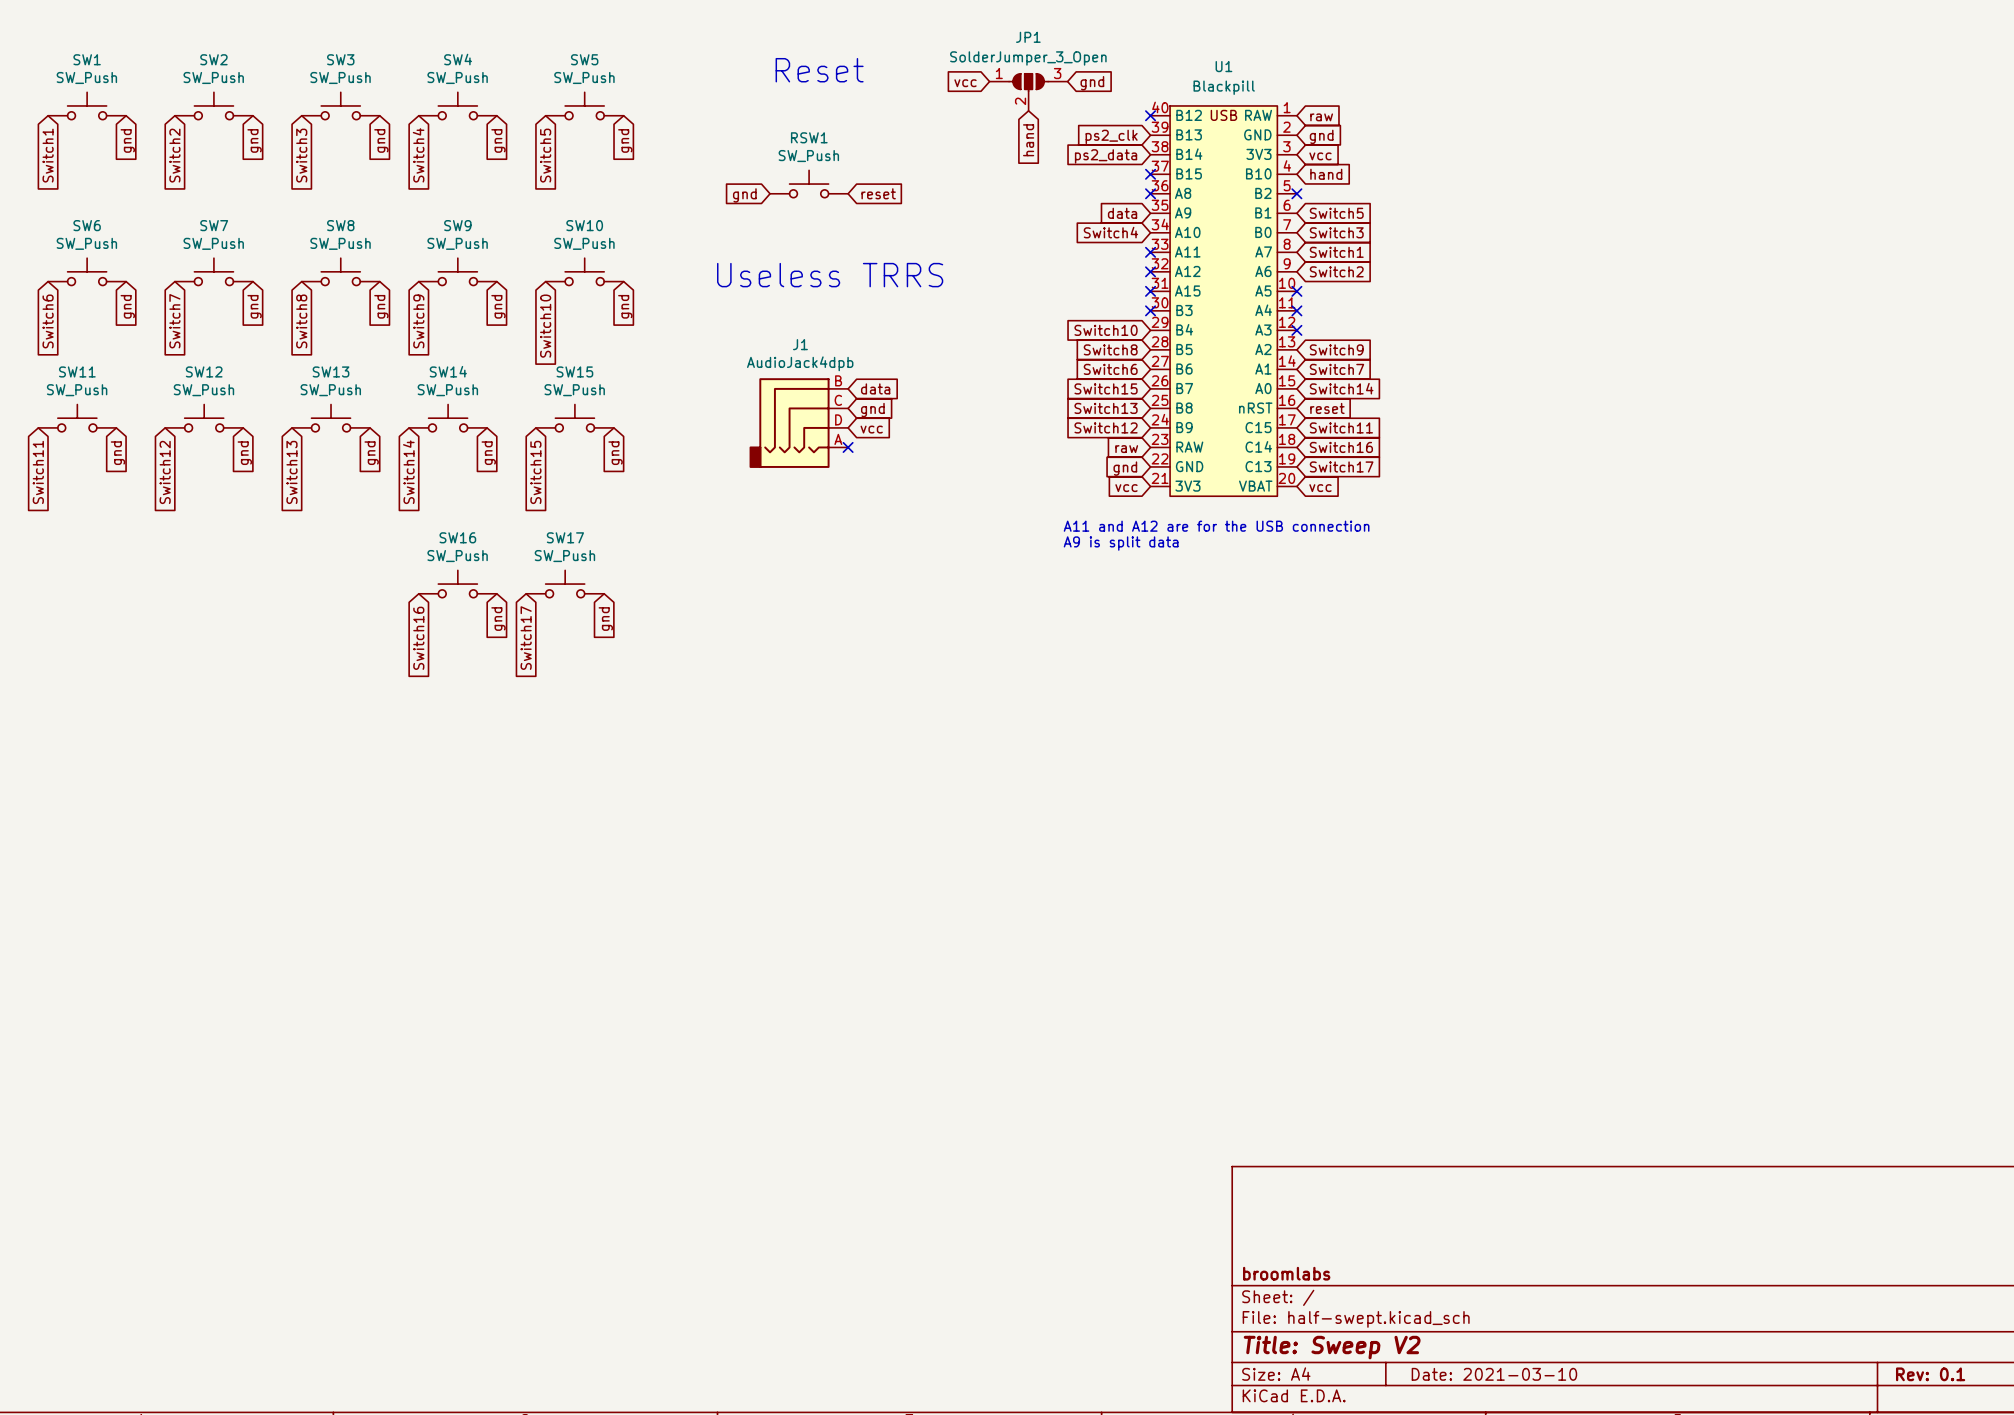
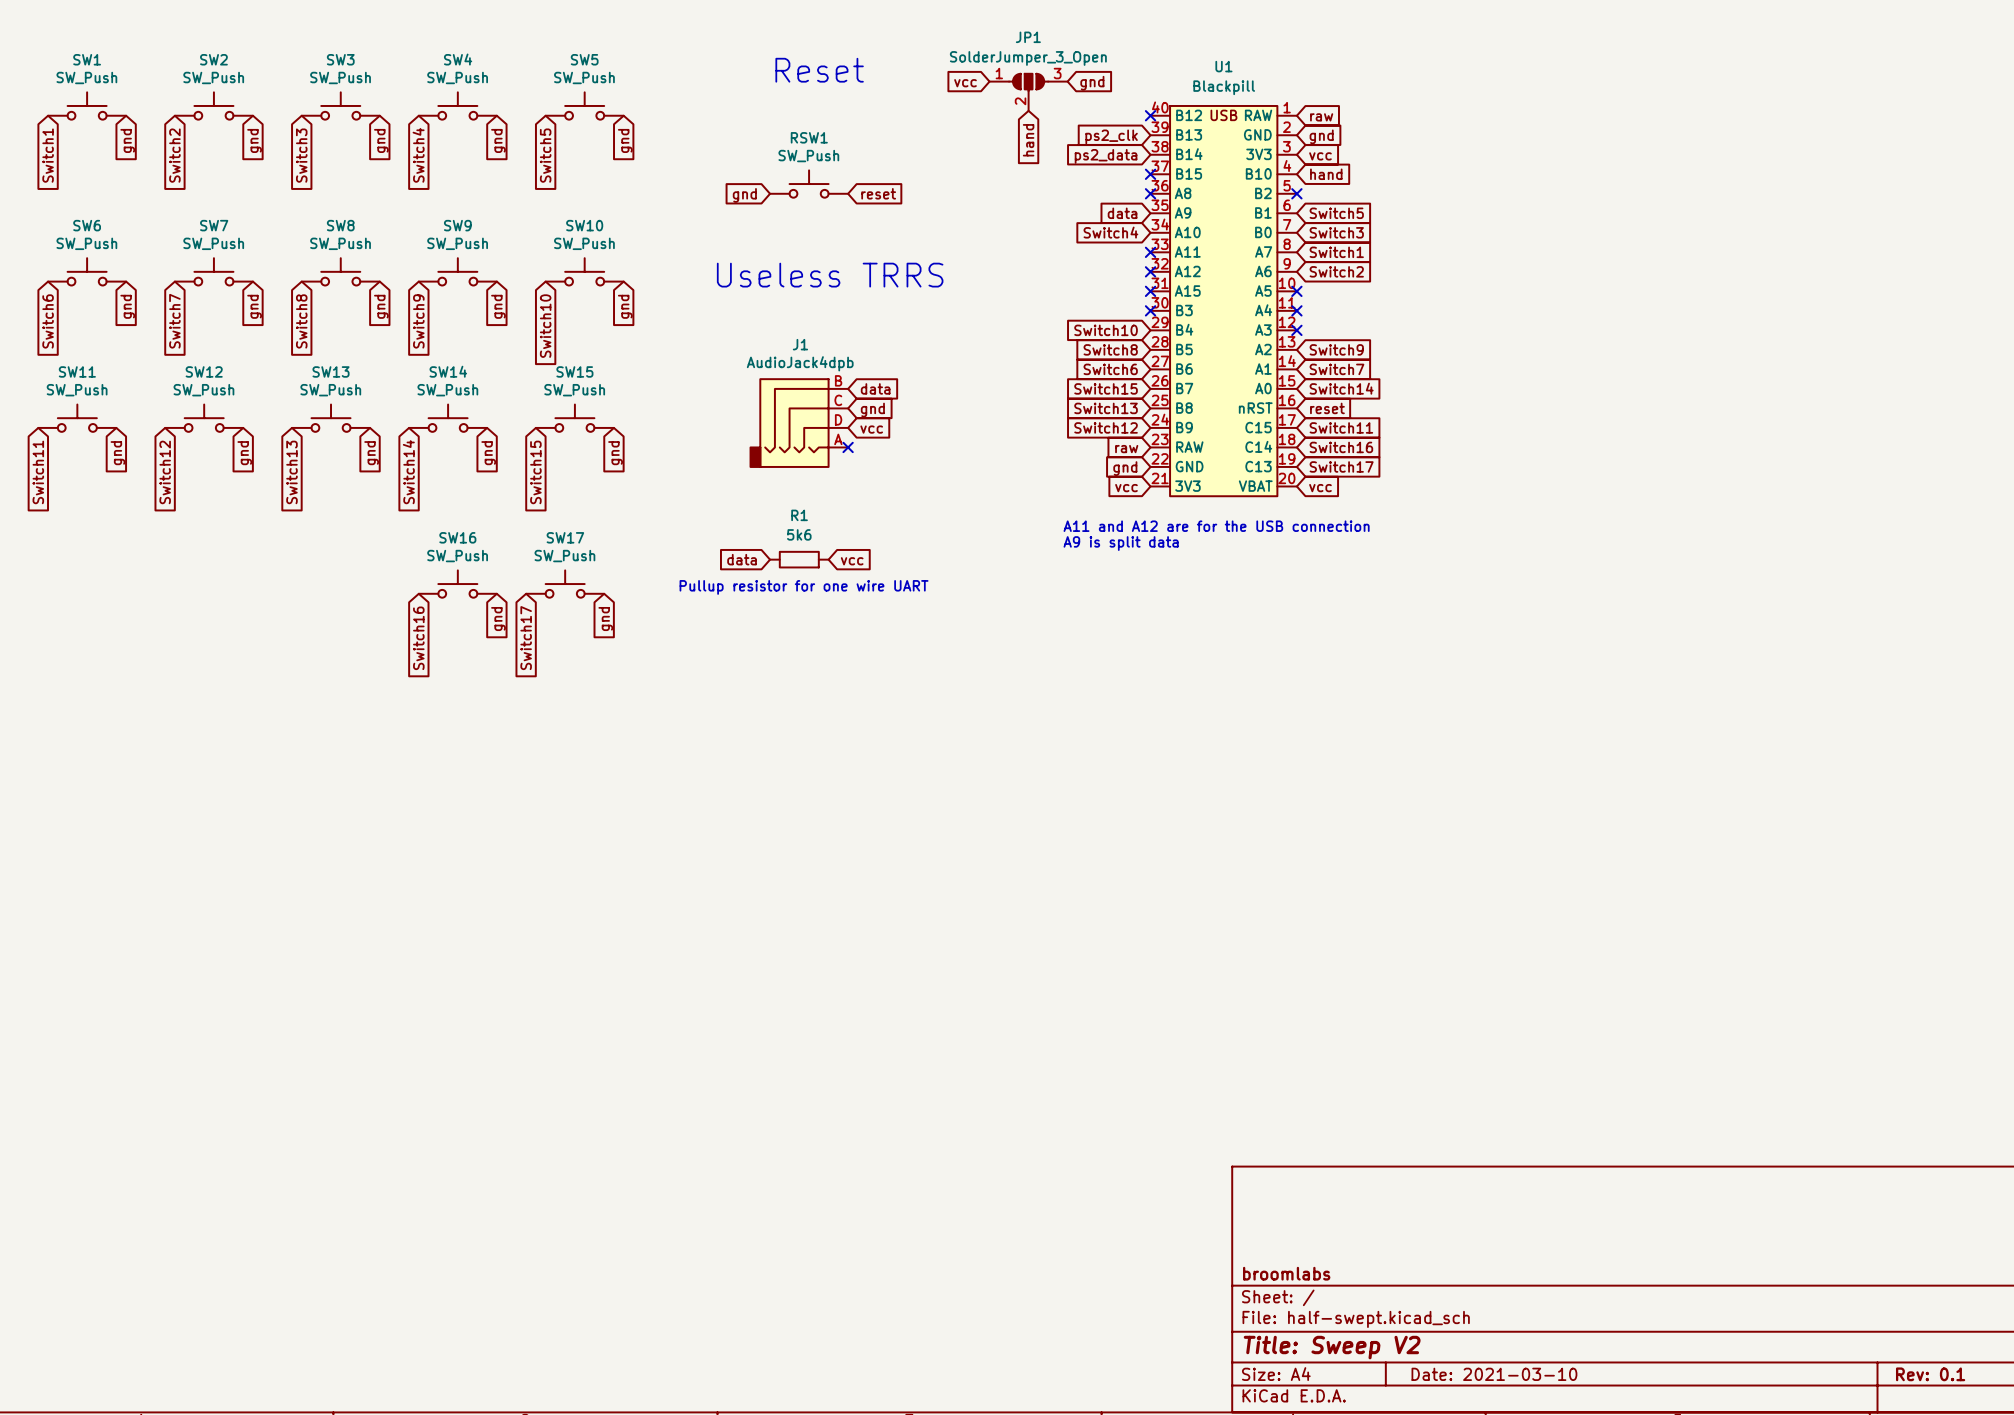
global label: none -> data (742, 559)
R1: none -> 5k6 (799, 559)
global label: none -> vcc (852, 561)
text: none -> Pullup resistor for one wire UART (804, 587)

